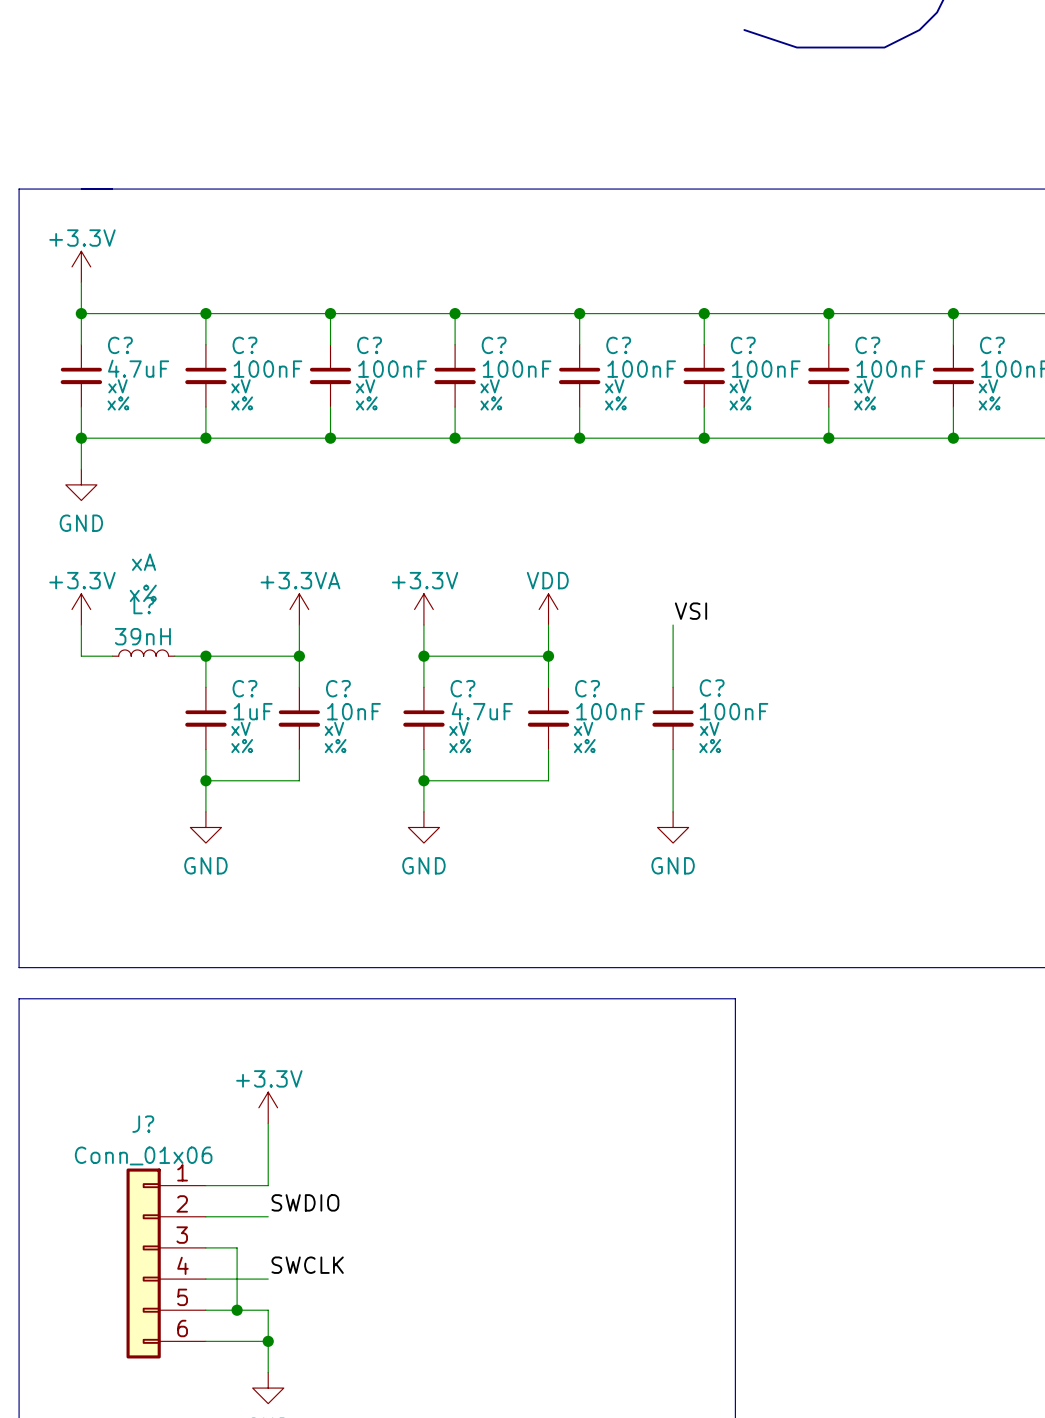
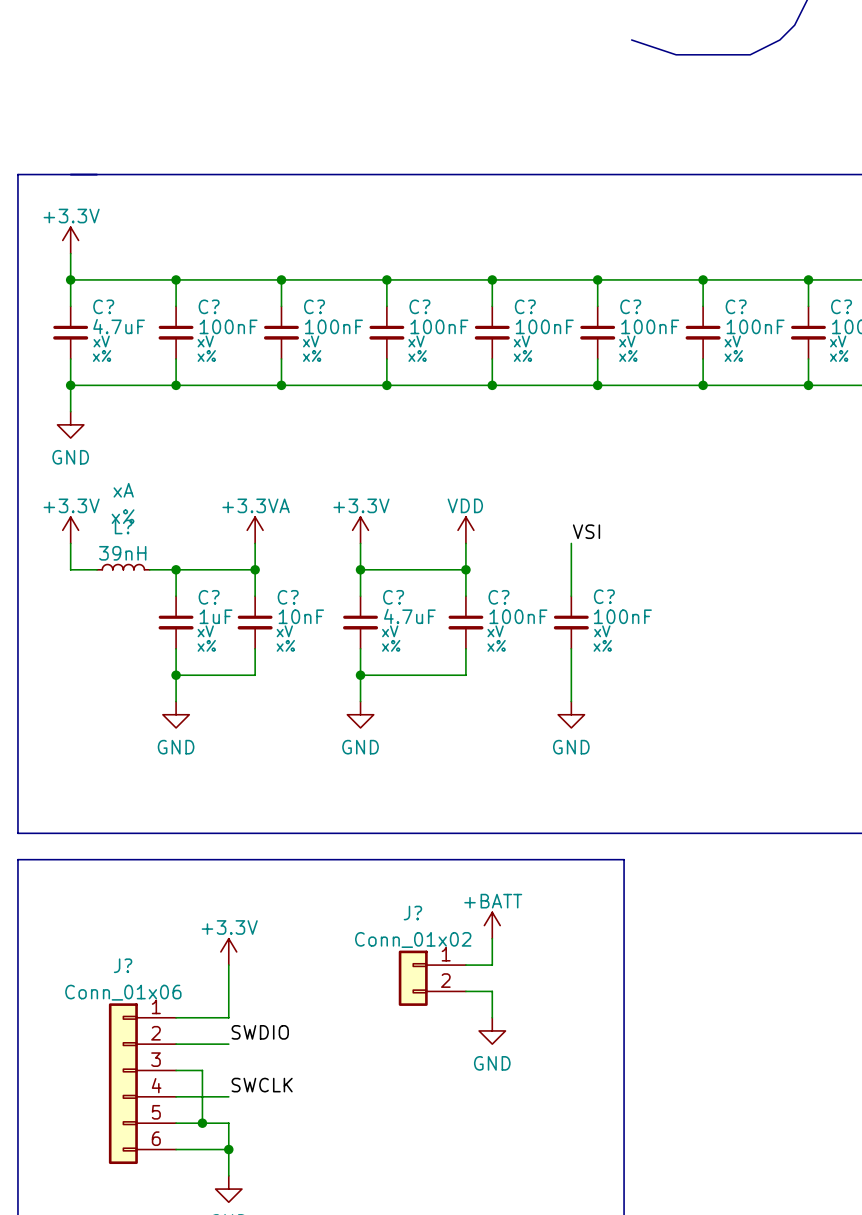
power symbol: none -> +BATT (492, 925)
wire: none -> (492, 938) (492, 965) (465, 965)
J?: none -> Conn_01x02 (432, 978)
wire: none -> (465, 991) (492, 991) (492, 1017)
power symbol: none -> GND (492, 1030)

